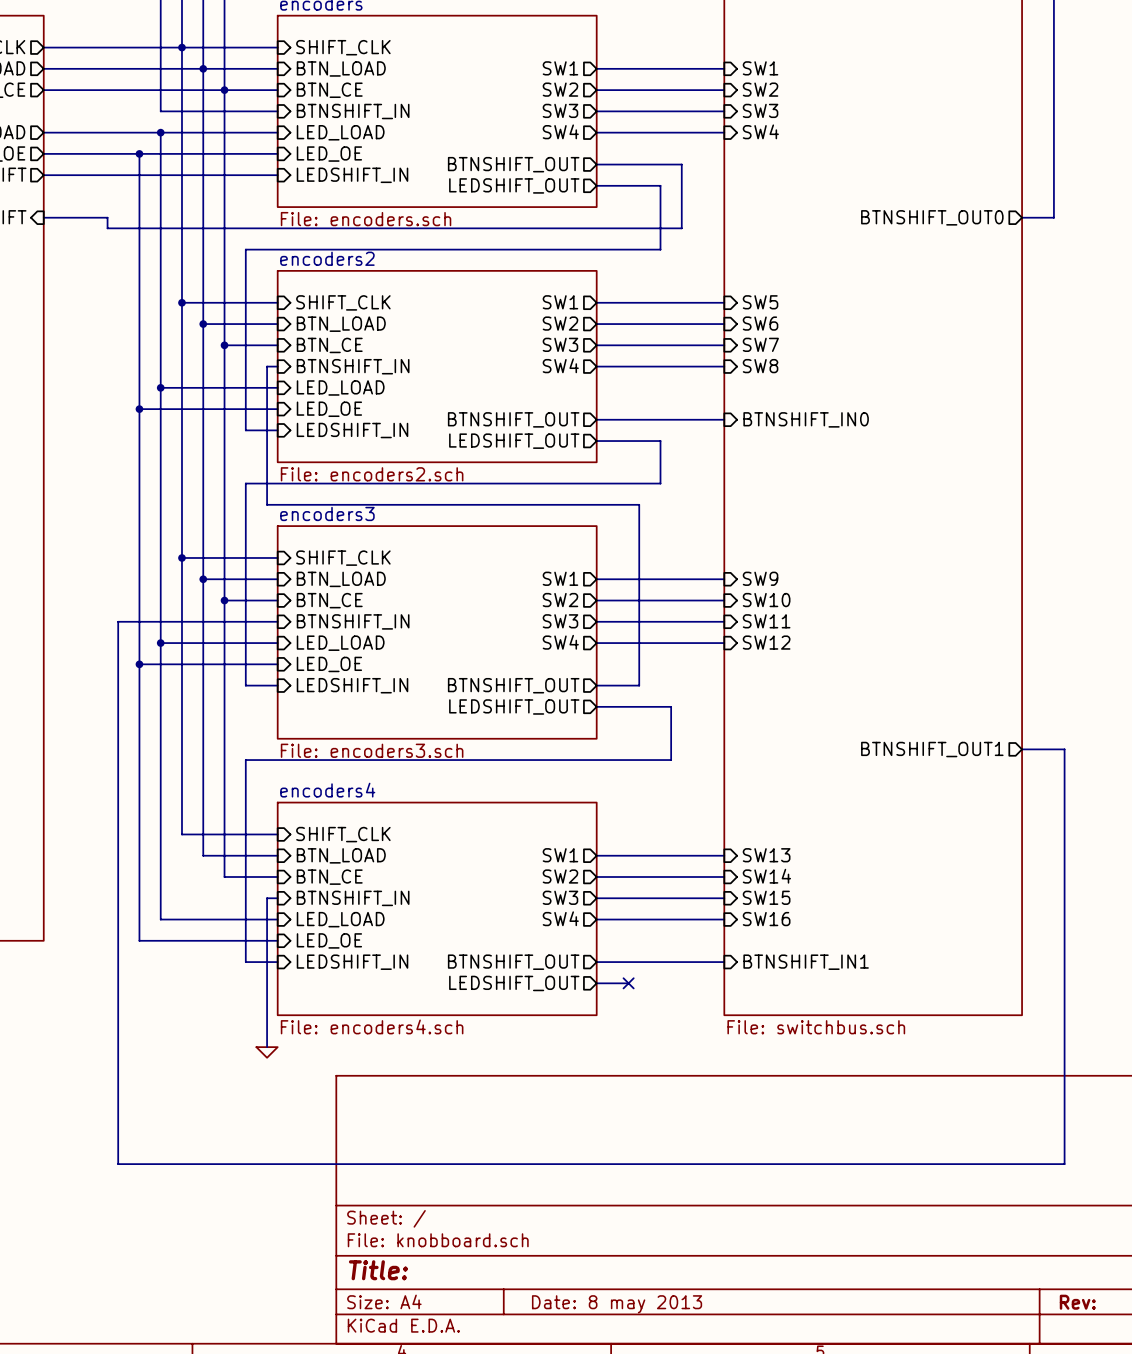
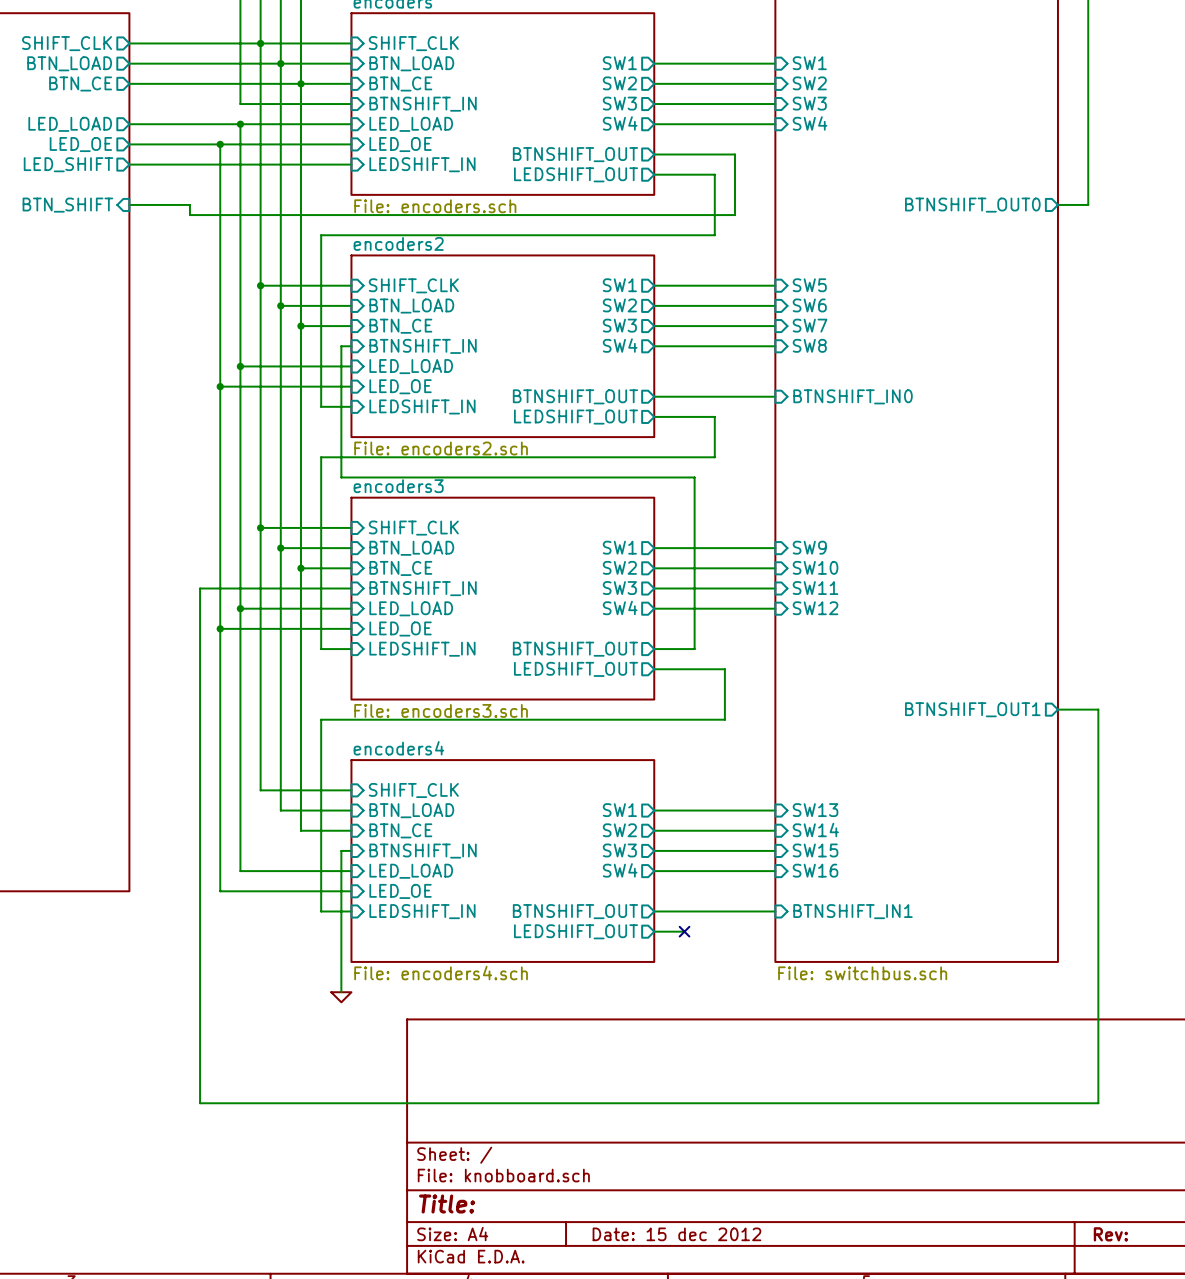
title block: Date: 8 may 2013 (617, 1304) -> Date: 15 dec 2012 (676, 1234)

